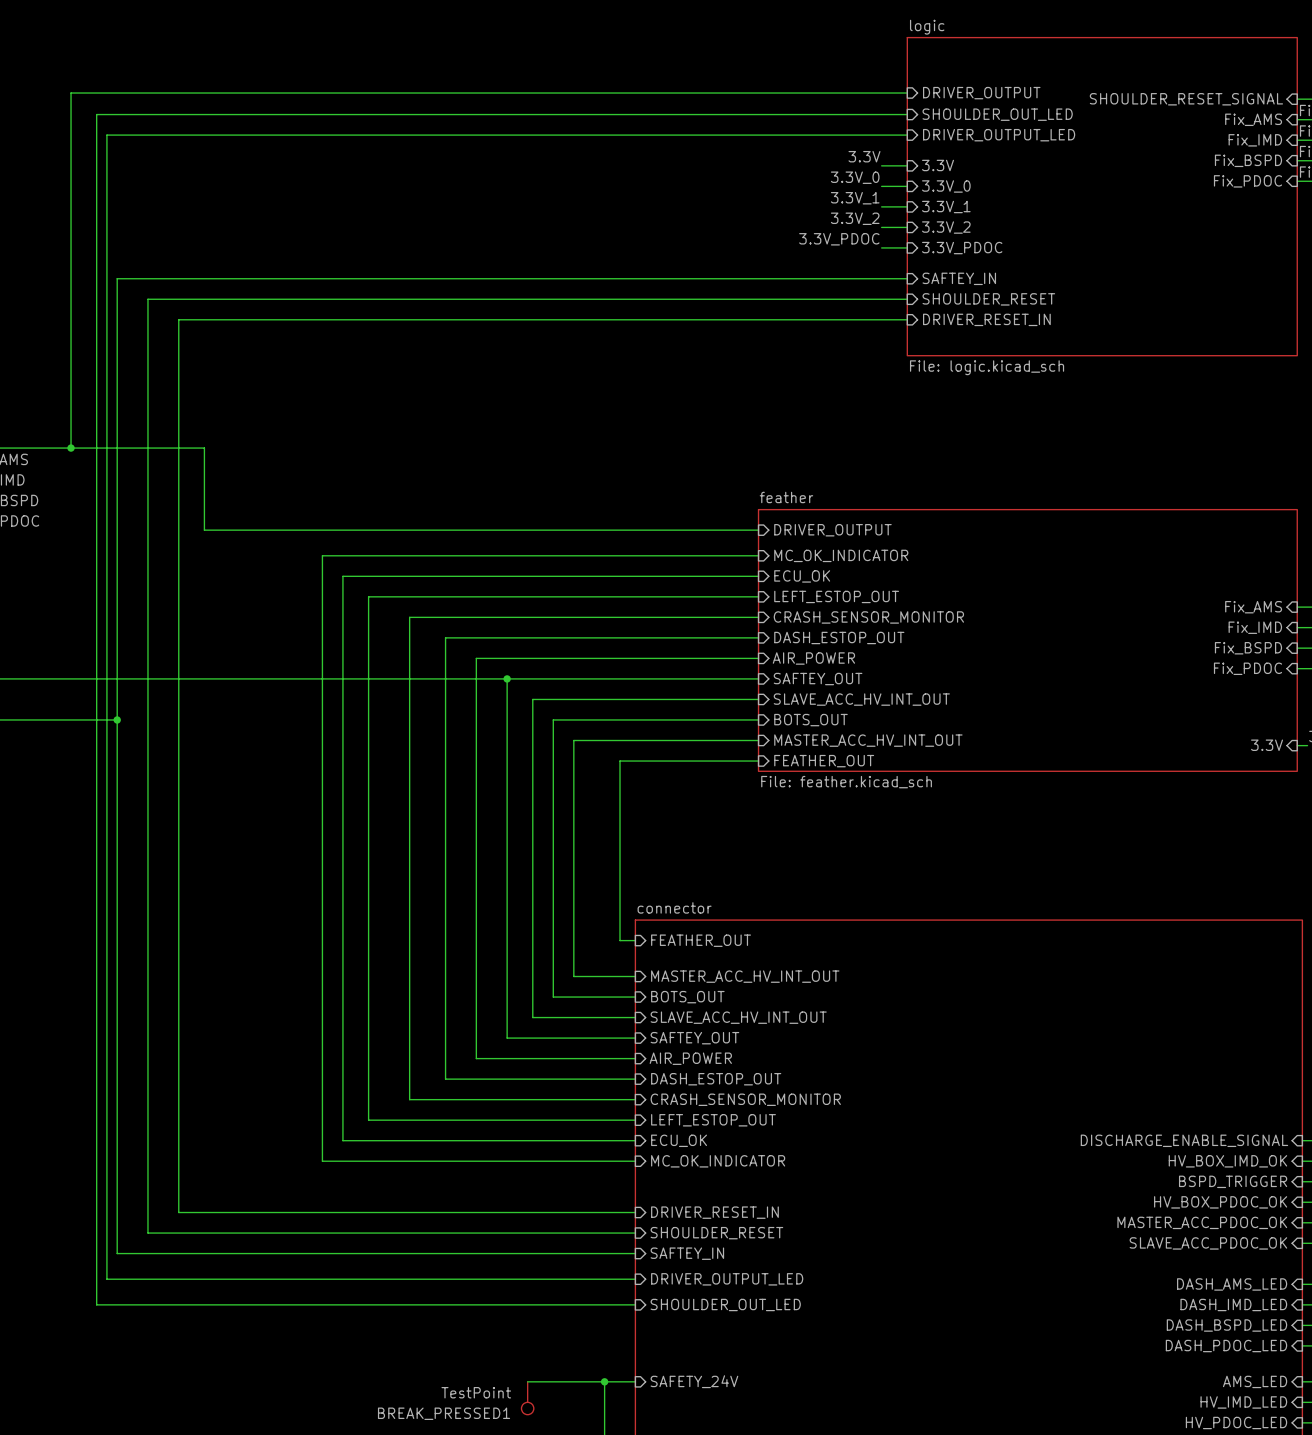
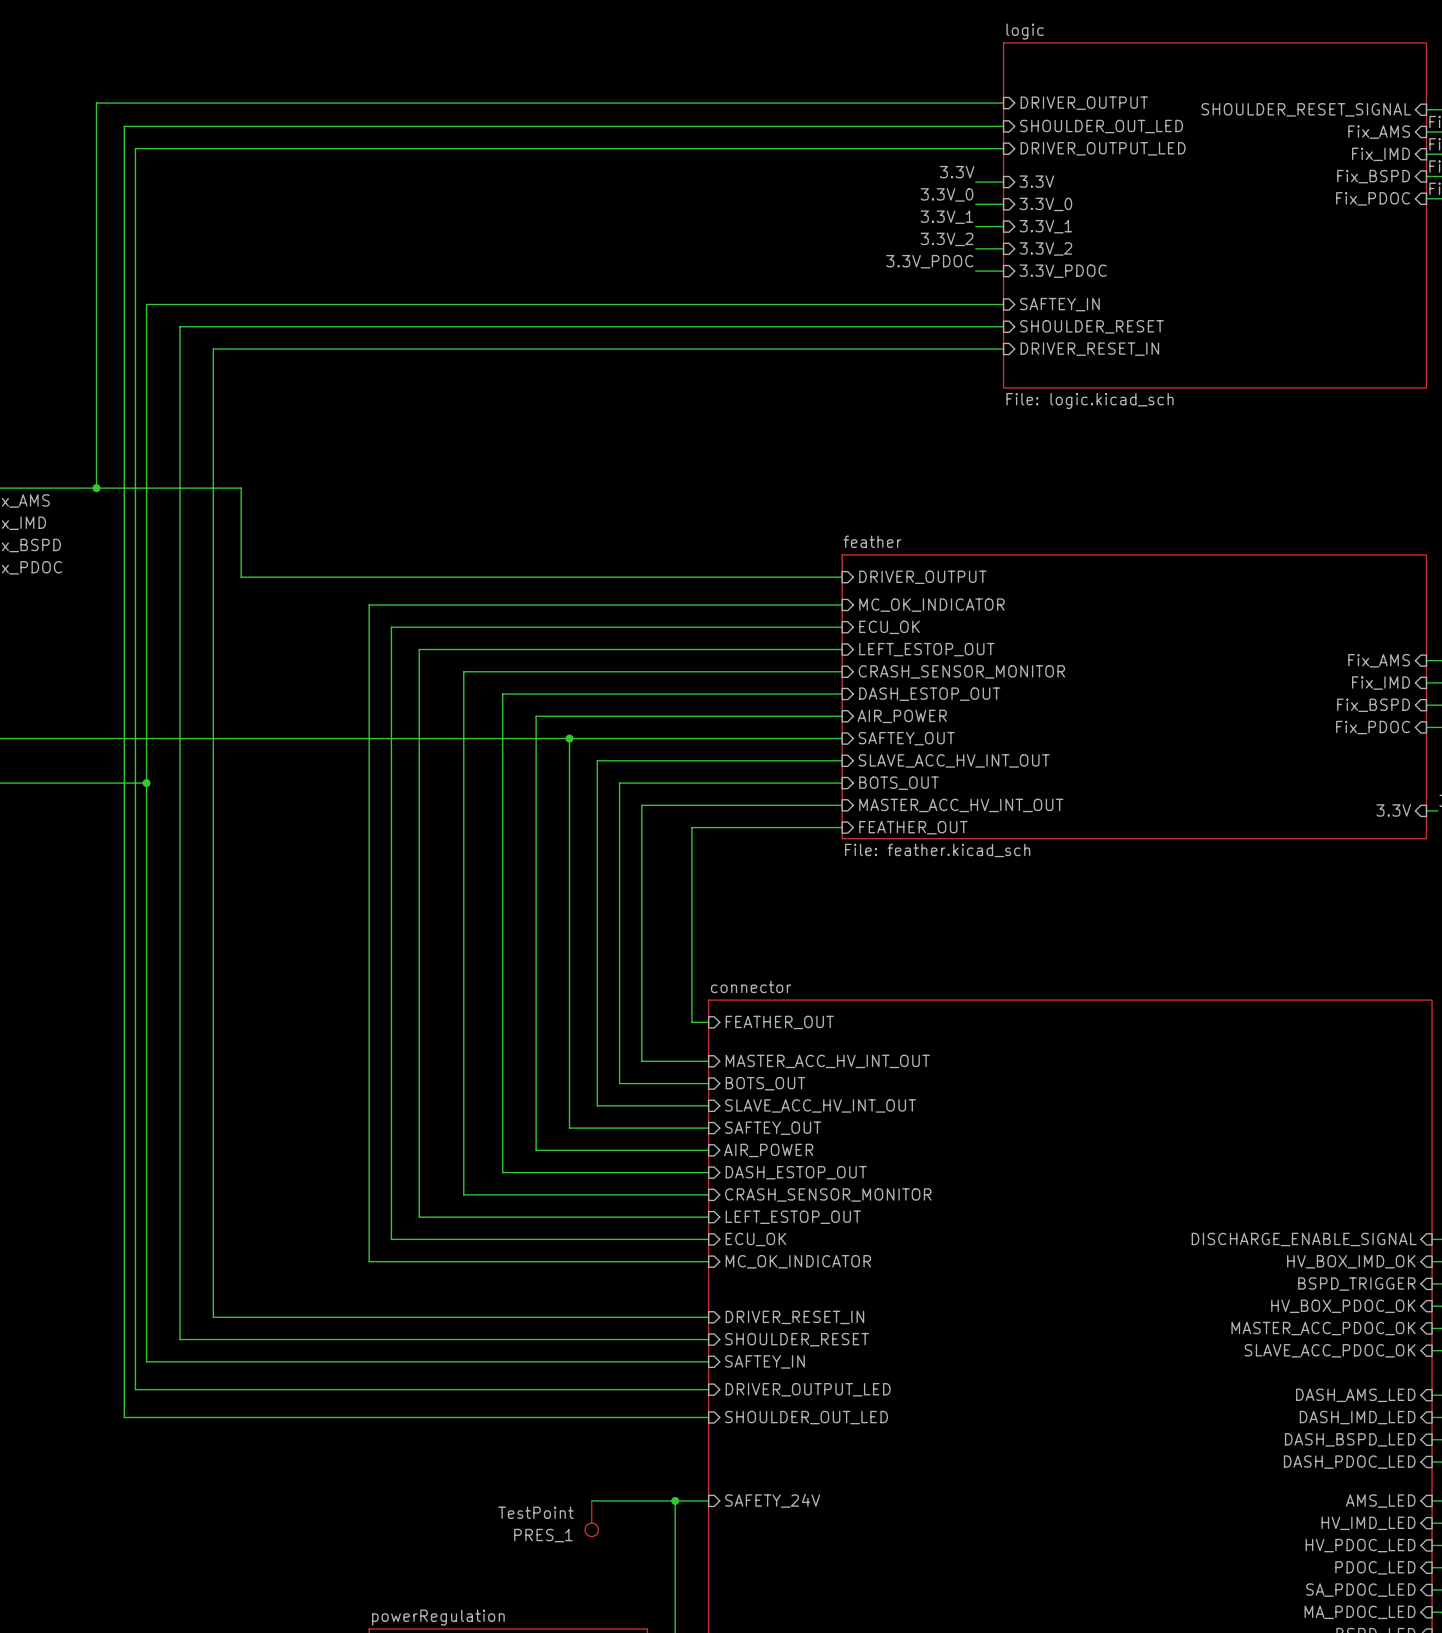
BREAK_PRESSED1 name: BREAK_PRESSED1 (444, 1413) -> PRES_1 (543, 1535)

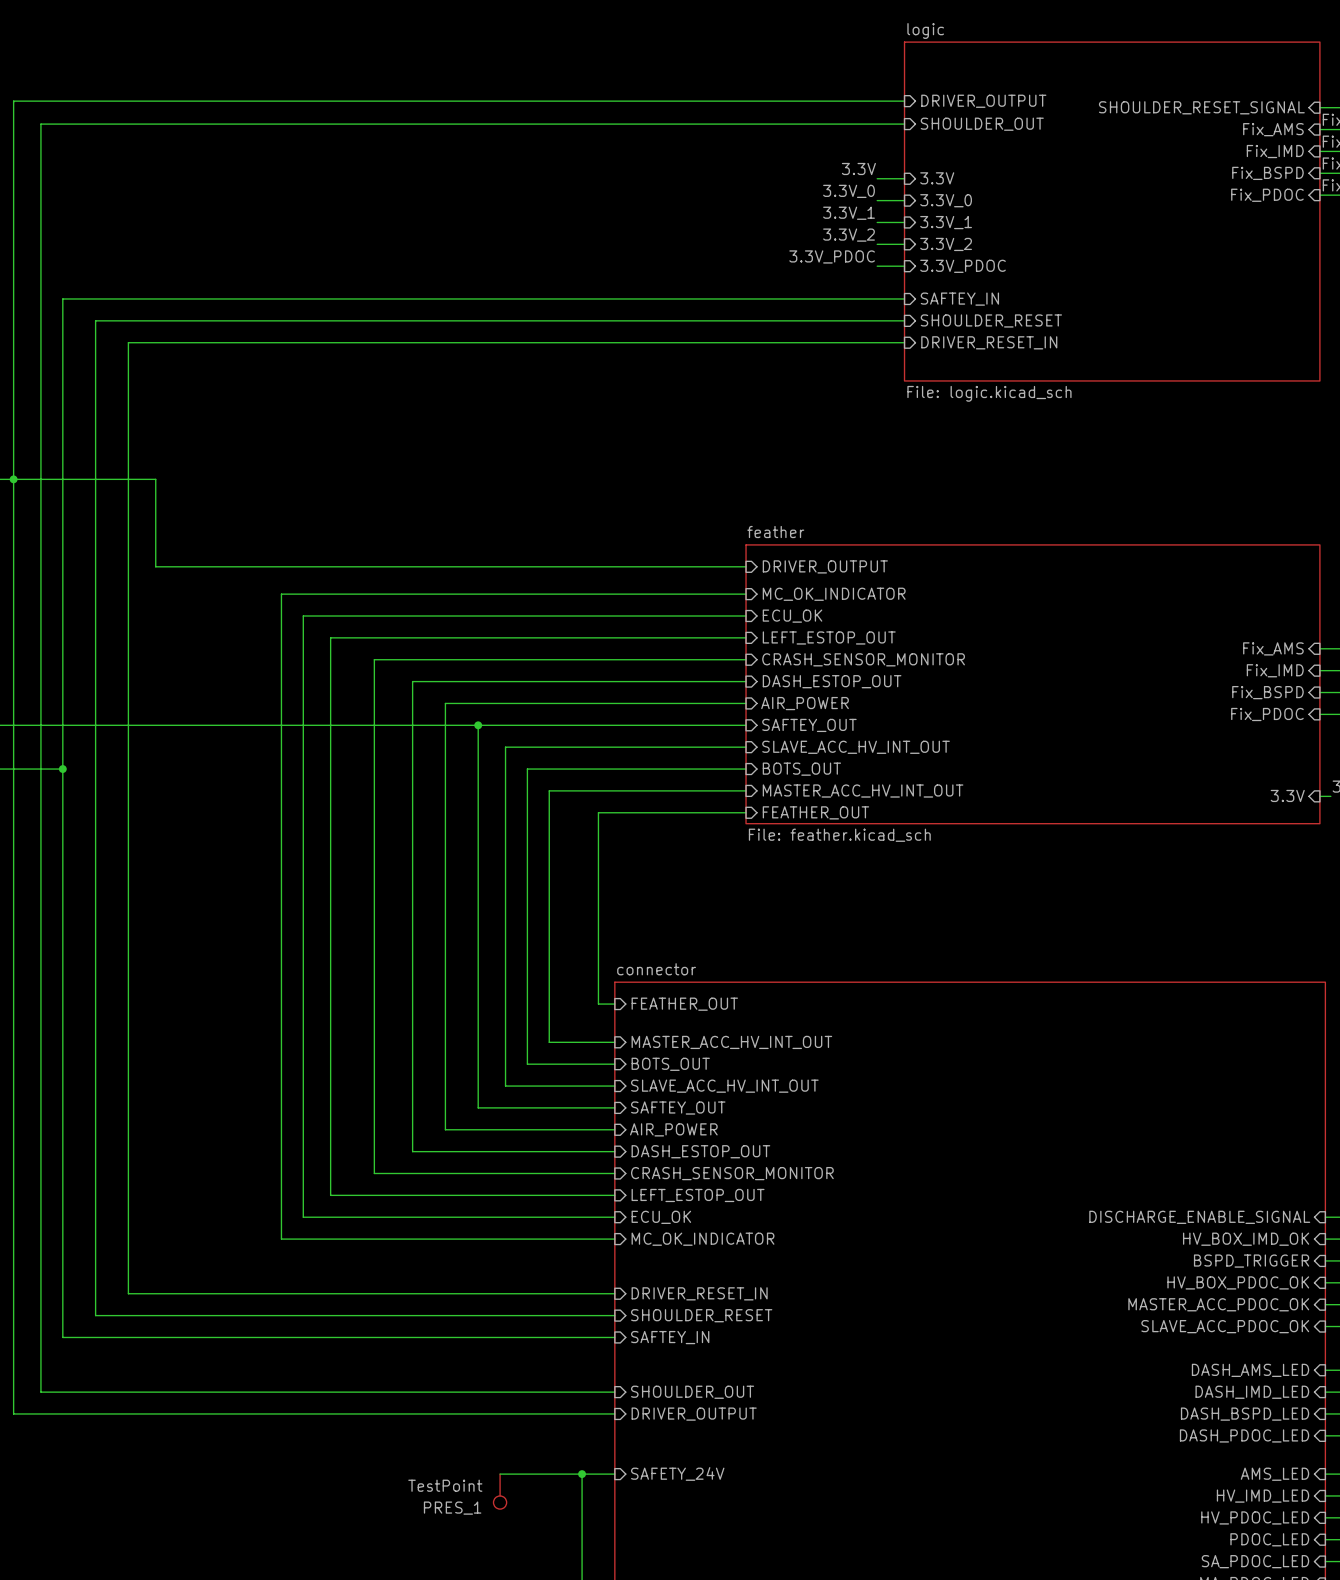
sheet pin: SHOULDER_OUT_LED (1101, 126) -> SHOULDER_OUT (982, 124)
wire: (1003, 148) (135, 148) (135, 1389) (708, 1389) -> none
sheet pin: DRIVER_OUTPUT_LED (1103, 148) -> none
wire: none -> (13, 479) (13, 1413) (614, 1413)
sheet pin: DRIVER_OUTPUT_LED (808, 1389) -> none
sheet pin: SHOULDER_OUT_LED (806, 1417) -> SHOULDER_OUT (692, 1392)
sheet pin: none -> DRIVER_OUTPUT (694, 1414)

